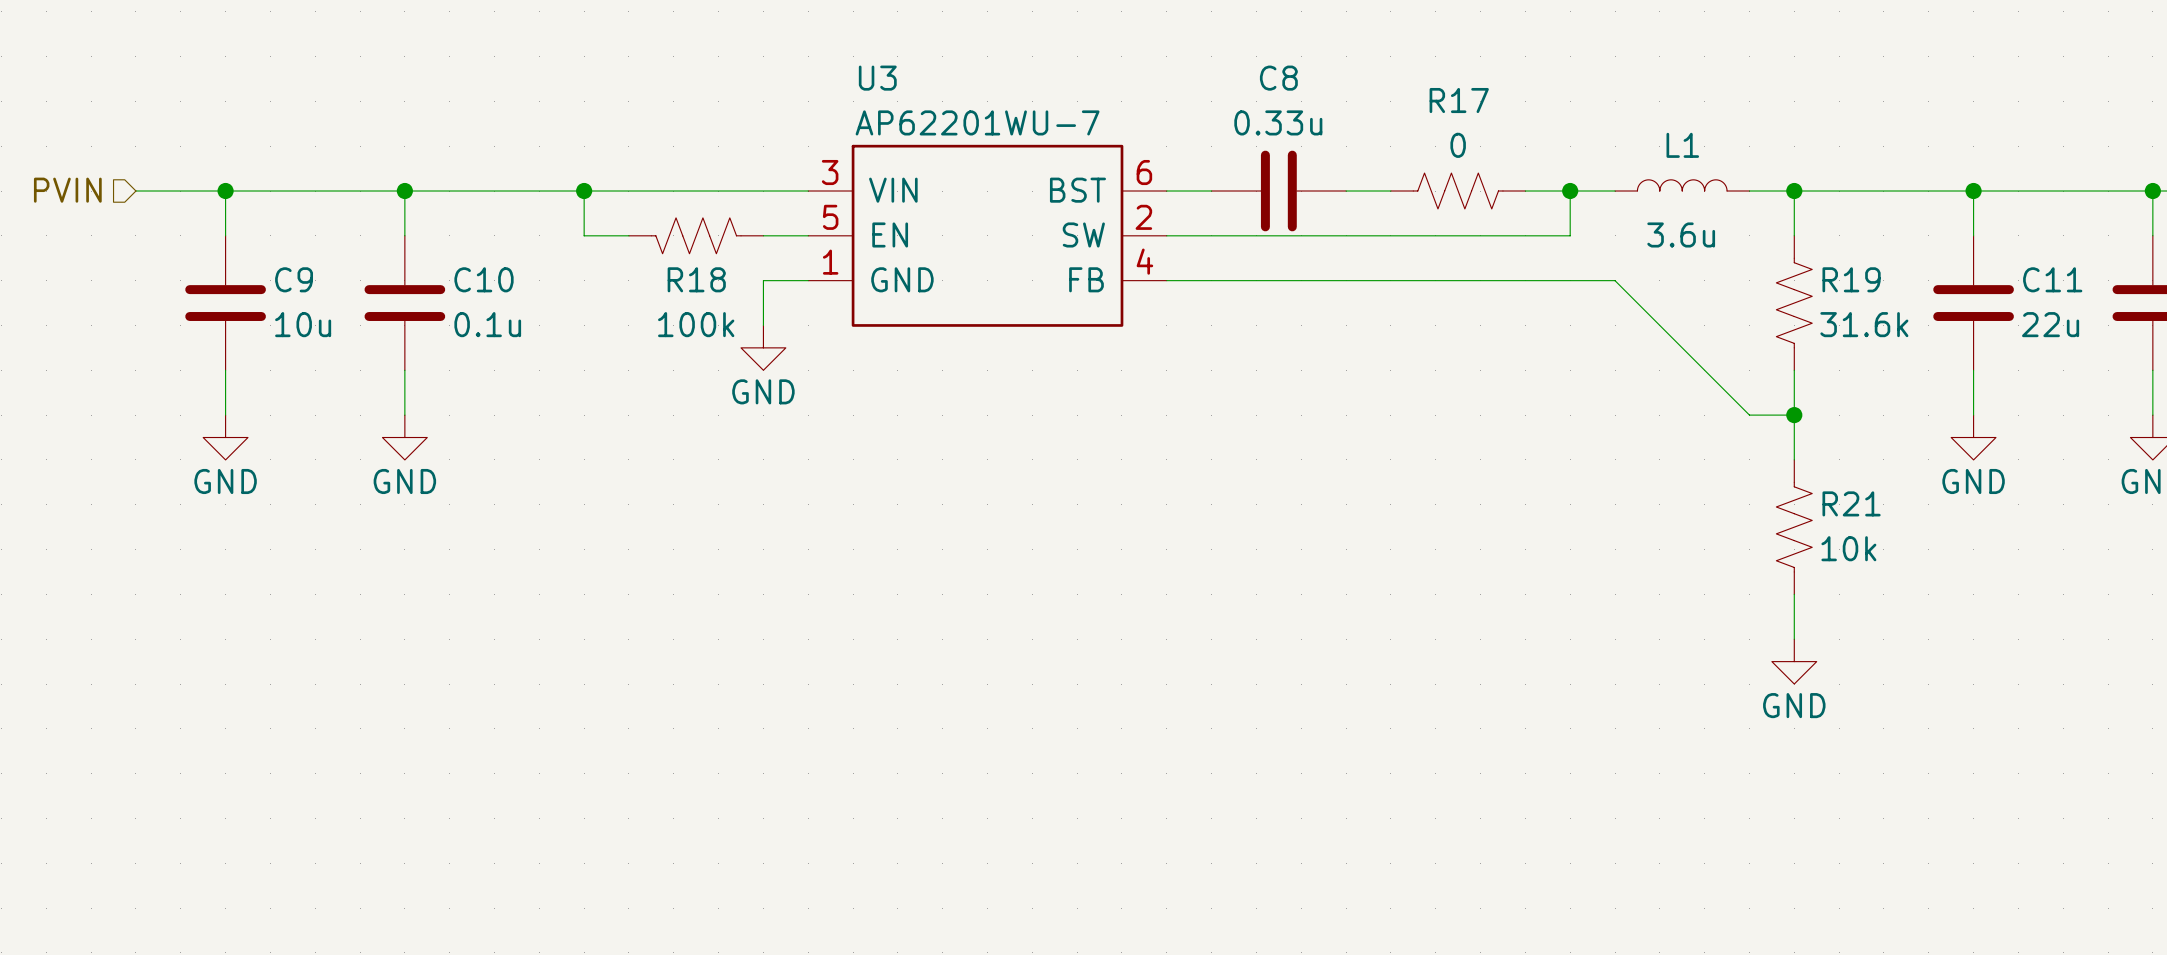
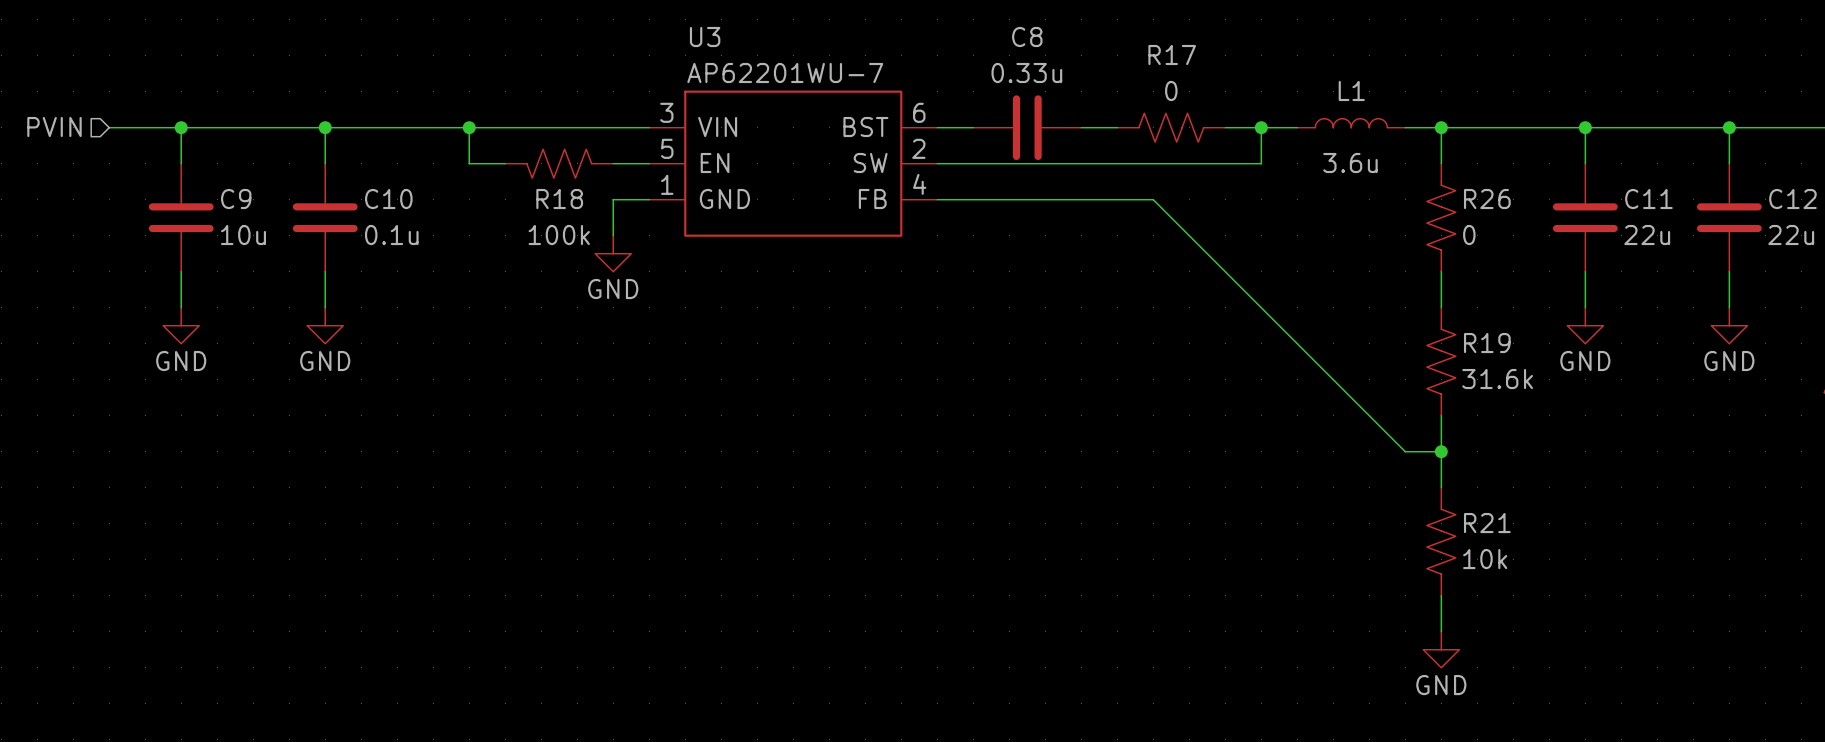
R19 name: R19 (1851, 279) -> R26 (1487, 199)
wire: (1435, 280) (1615, 280) (1749, 415) (1794, 415) (1794, 459) -> (1153, 199) (1405, 451) (1441, 451) (1441, 415)
R19 value: 31.6k (1864, 324) -> 0 (1469, 235)
junction: (1794, 415) -> none
R19: none -> 31.6k (1441, 361)
R21 position: (1794, 527) -> (1441, 541)
junction: none -> (1441, 451)
power symbol position: GND (1794, 661) -> GND (1441, 649)
wire: none -> (1441, 595) (1441, 631)

